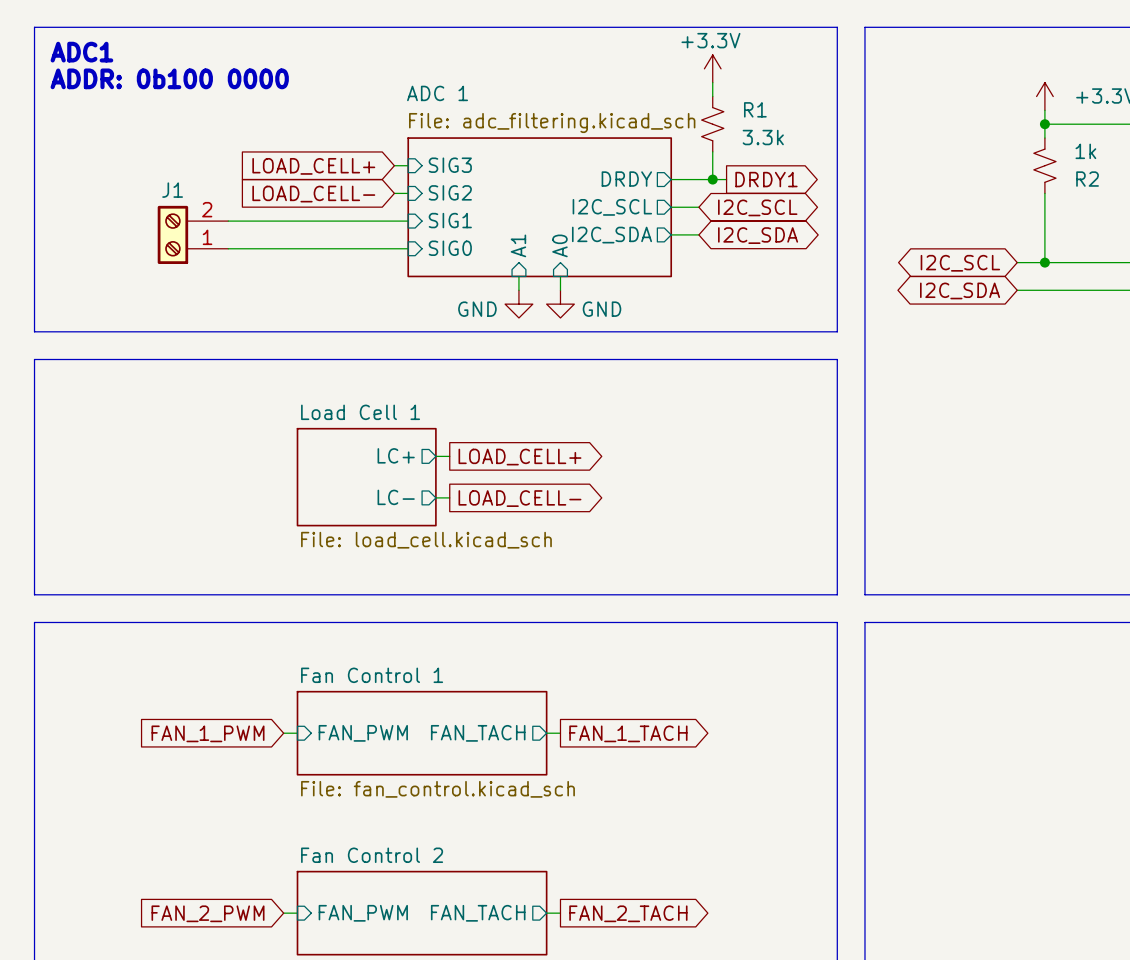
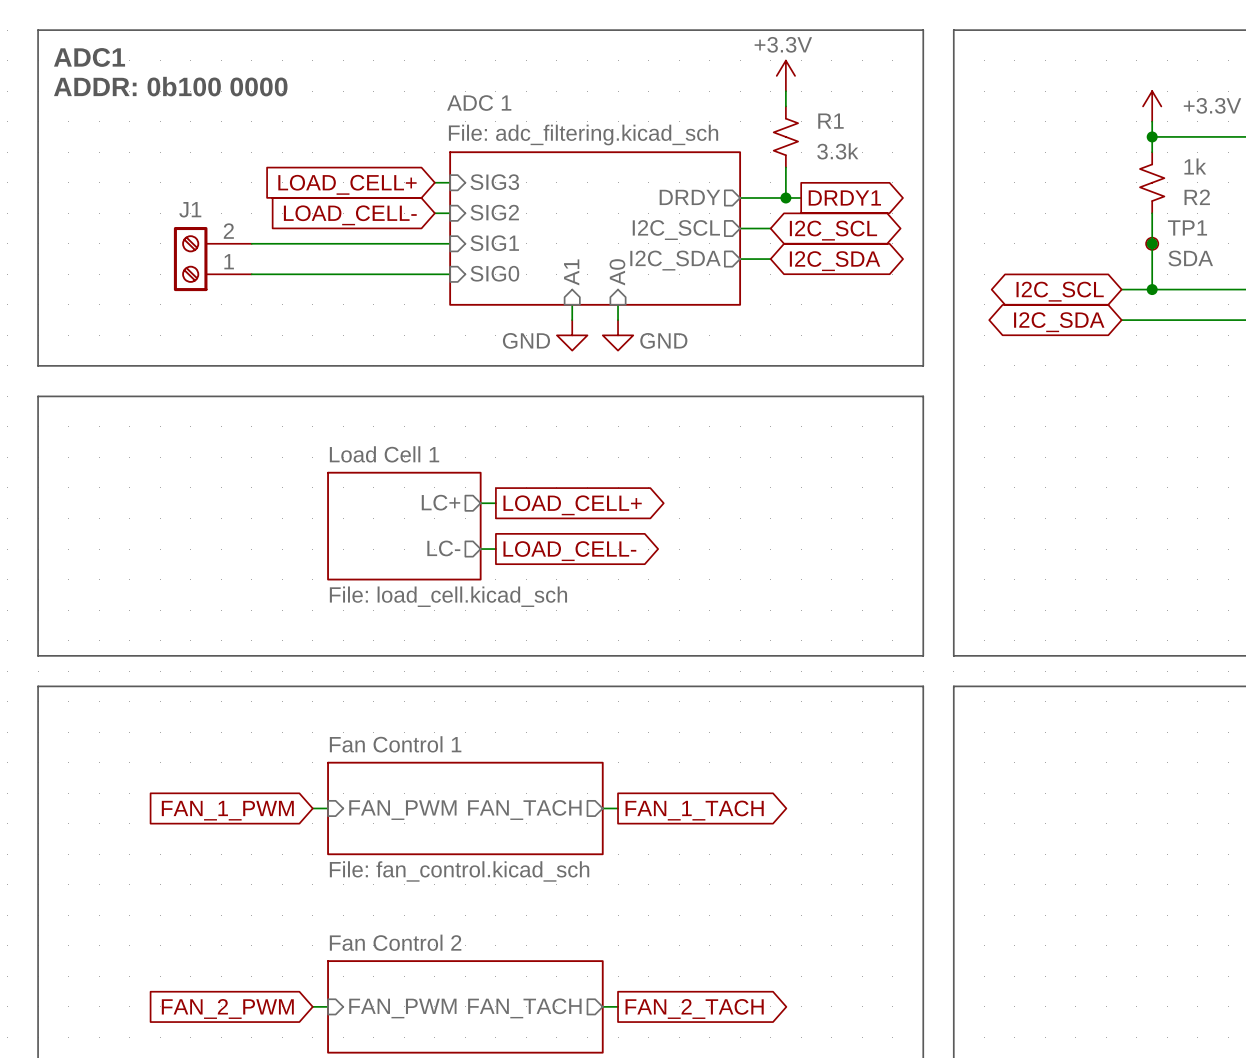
junction: none -> (1152, 243)
TP1: none -> SDA (1152, 243)

